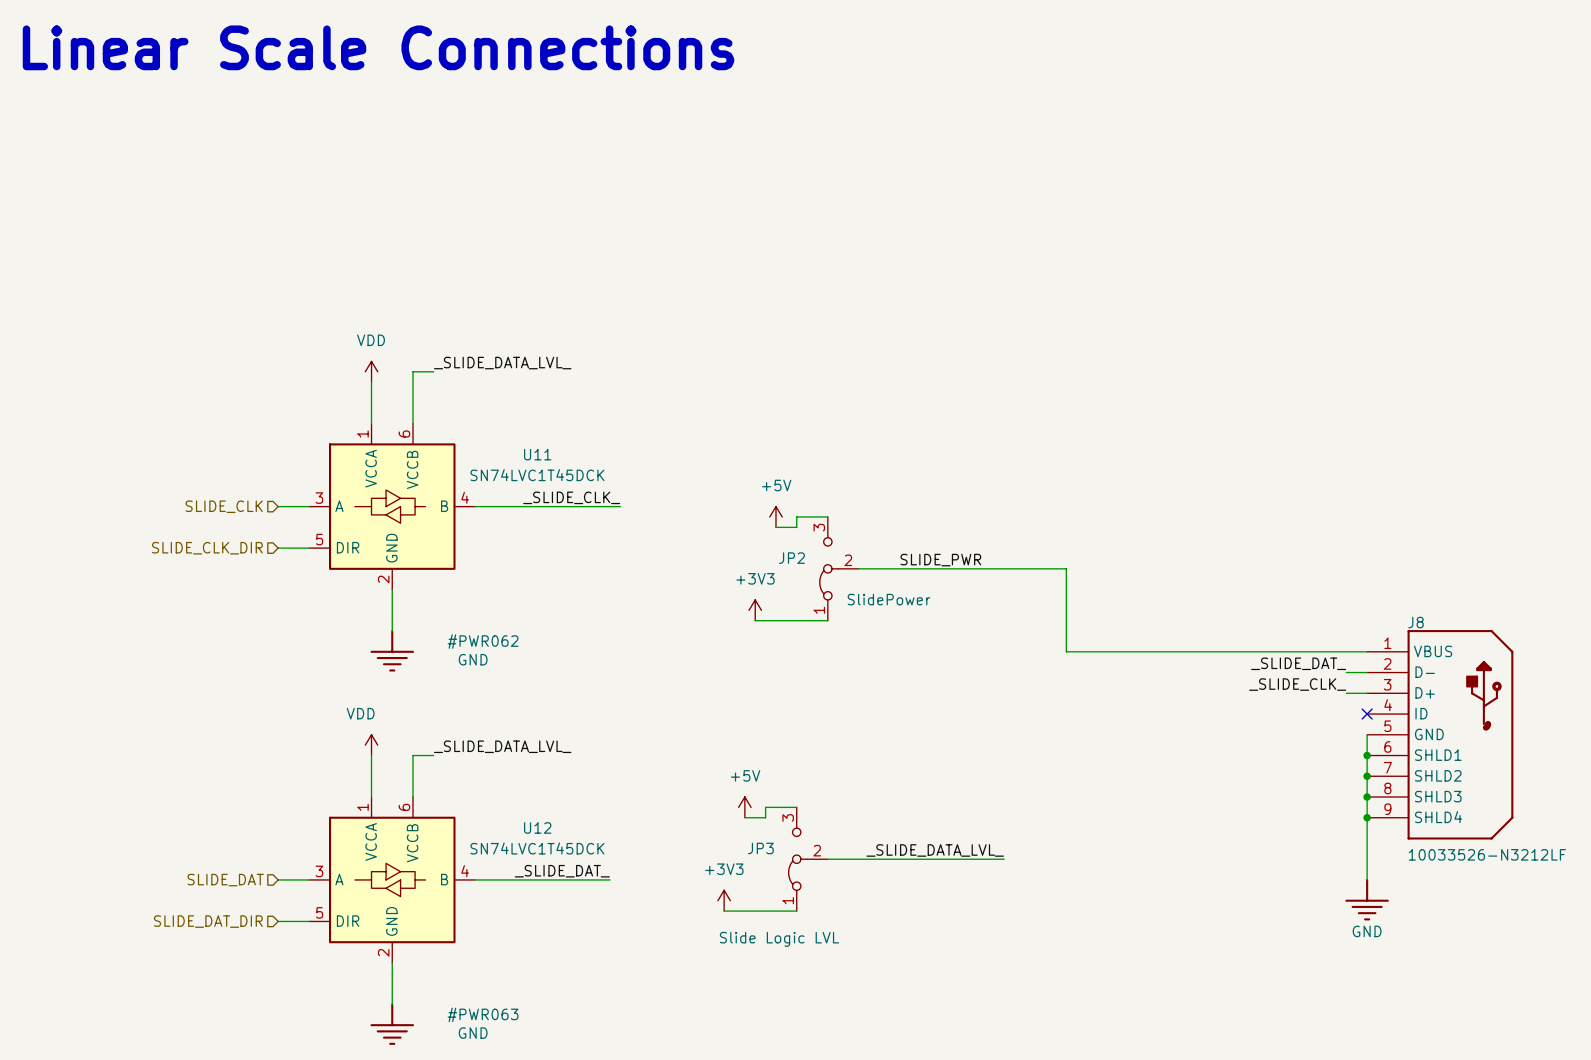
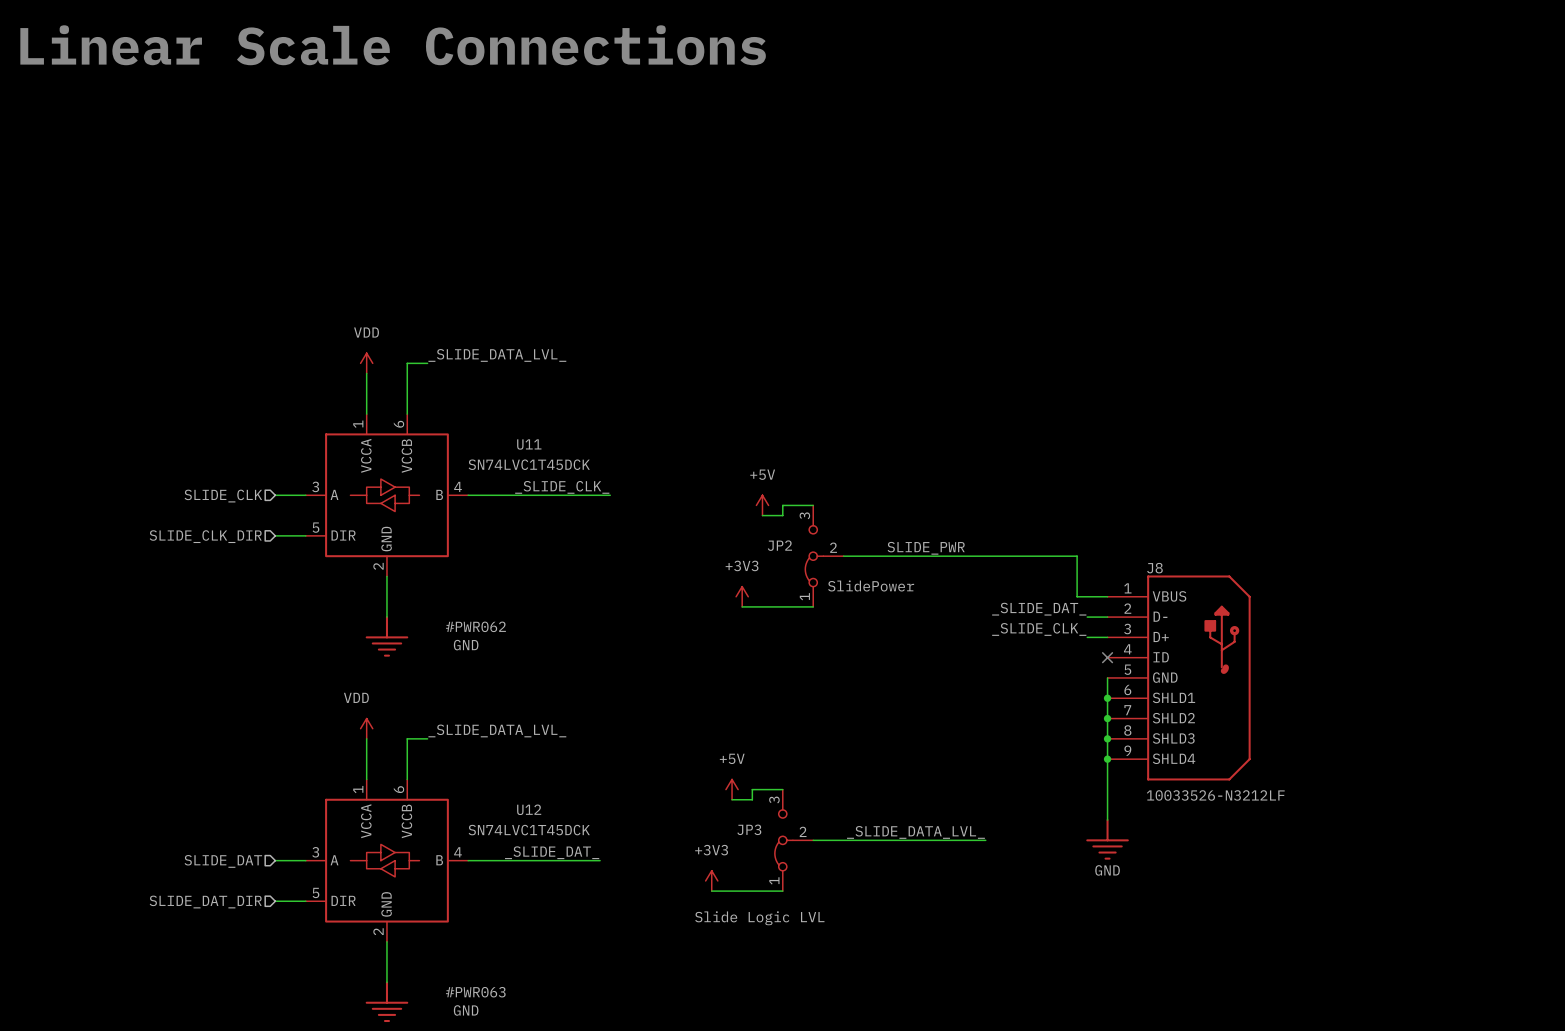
wire: (1066, 568) (1066, 651) (1107, 651) -> (1046, 556) (1077, 556) (1077, 596) (1107, 596)
label: none -> _SLIDE_DAT_ (1039, 609)
wire: none -> (1087, 617) (1107, 617)
label: none -> _SLIDE_CLK_ (1039, 629)
wire: (1128, 651) (1367, 651) -> none
label: _SLIDE_DAT_ (1298, 663) -> none
no-connect mark: none -> (1107, 657)
wire: (1346, 672) (1367, 672) -> none
label: _SLIDE_CLK_ (1297, 684) -> none
wire: none -> (1107, 677) (1107, 820)
wire: (1346, 693) (1367, 693) -> none
junction: none -> (1107, 698)
no-connect mark: (1367, 714) -> none
junction: none -> (1107, 718)
wire: (1367, 734) (1367, 879) -> none
J8 position: (1440, 734) -> (1179, 677)
junction: none -> (1107, 738)
junction: (1367, 755) -> none
junction: none -> (1107, 759)
junction: (1367, 776) -> none
junction: (1367, 797) -> none
junction: (1367, 817) -> none
power symbol: none -> GND (1107, 839)
power symbol: GND (1367, 899) -> none

